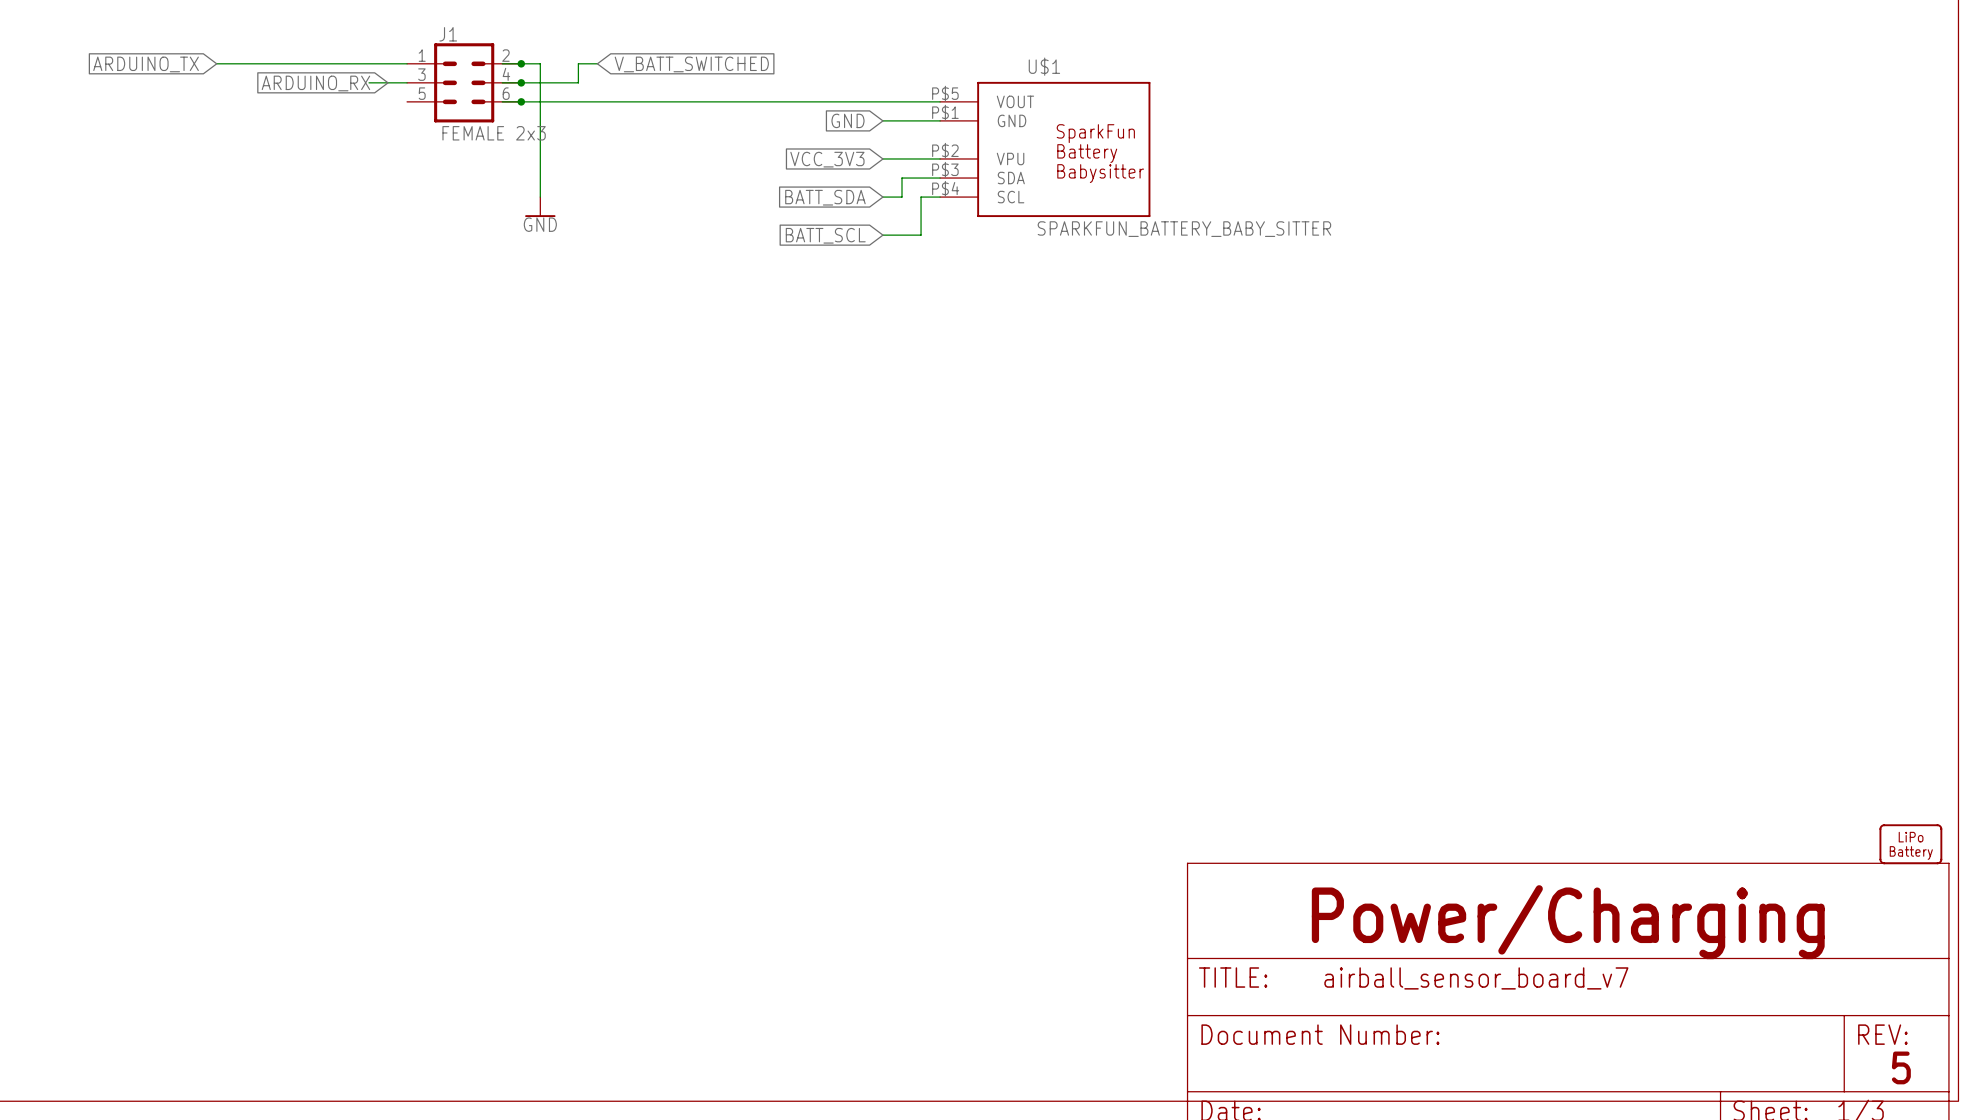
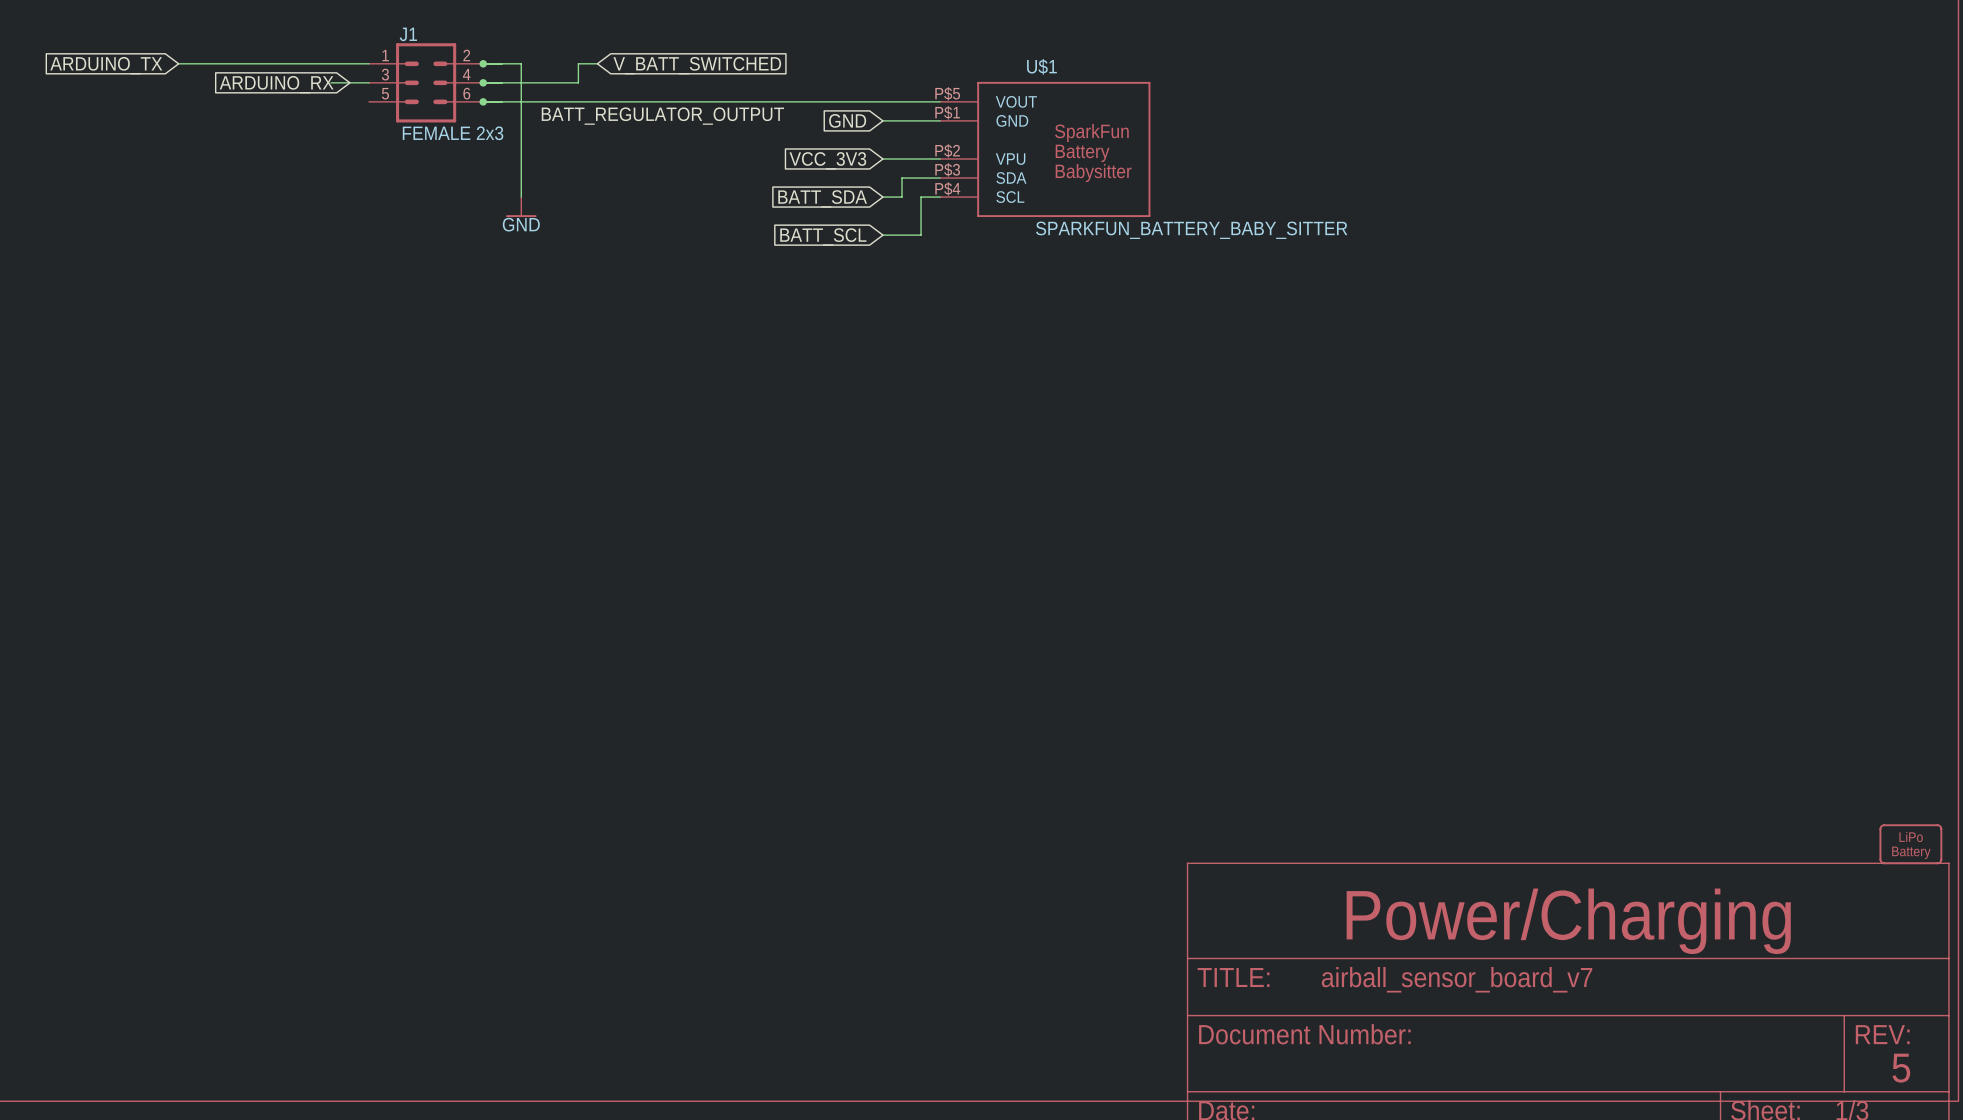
wire: none -> (178, 63) (216, 63)
junction: none -> (483, 63)
wire: (521, 63) (540, 63) (540, 197) -> (521, 63) (521, 197)
junction: (521, 63) -> none
global label position: ARDUINO_TX (146, 64) -> ARDUINO_TX (106, 65)
J1 position: (464, 82) -> (426, 82)
junction: none -> (483, 82)
junction: (521, 82) -> none
global label position: ARDUINO_RX (315, 83) -> ARDUINO_RX (276, 84)
junction: none -> (483, 101)
junction: (521, 101) -> none
label: none -> BATT_REGULATOR_OUTPUT (662, 116)
power symbol position: GND (540, 207) -> GND (521, 207)

